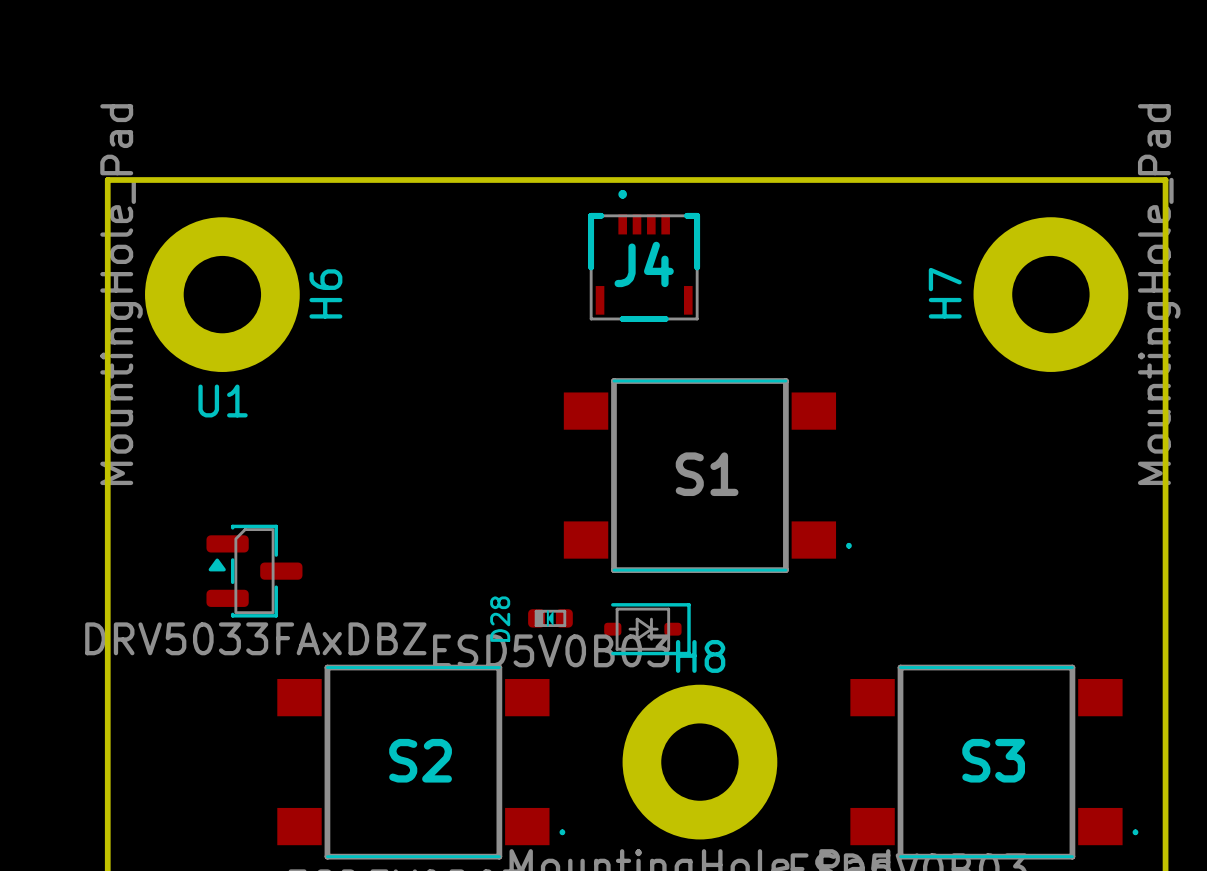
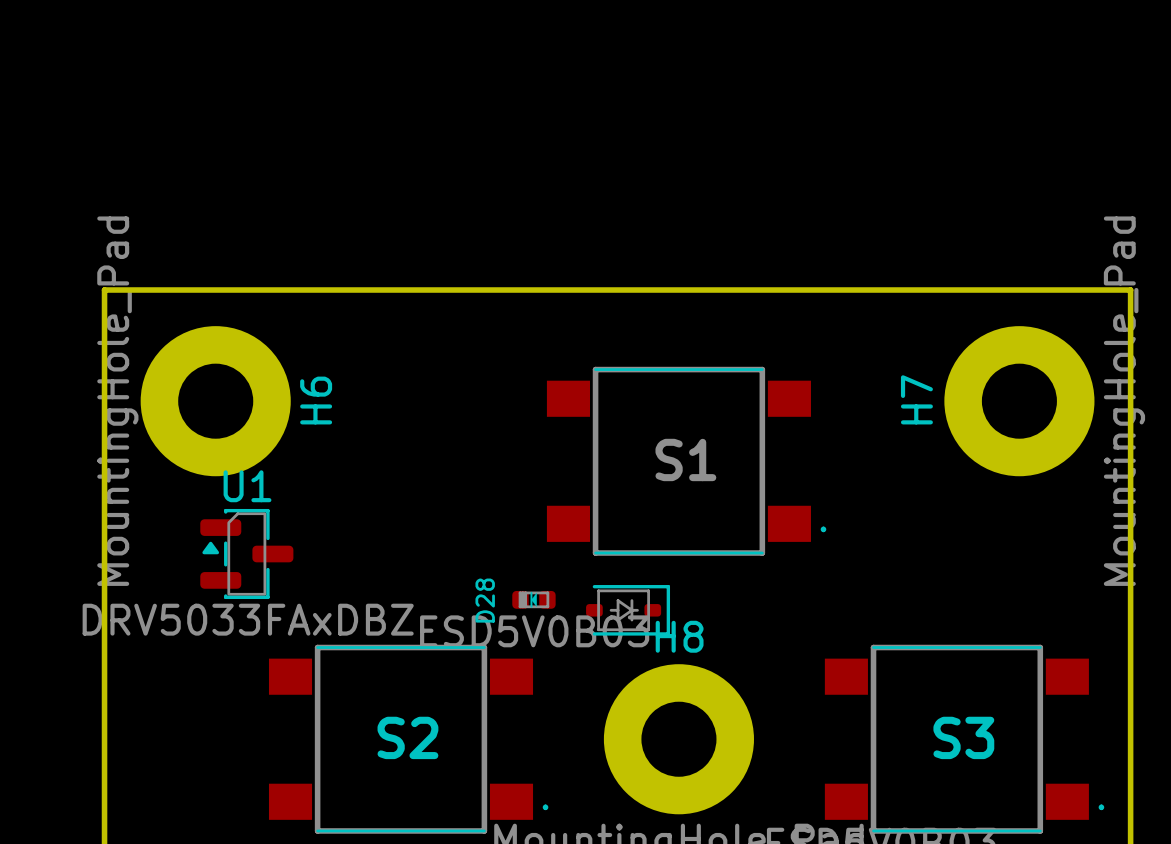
J4: (644, 255) -> none
H6 position: (222, 294) -> (215, 401)
H7 position: (1050, 294) -> (1019, 401)
board edge: (107, 298) (107, 180) (1165, 180) (1165, 298) -> (104, 290) (1130, 290)
U1 name position: U1 (223, 400) -> U1 (247, 486)

